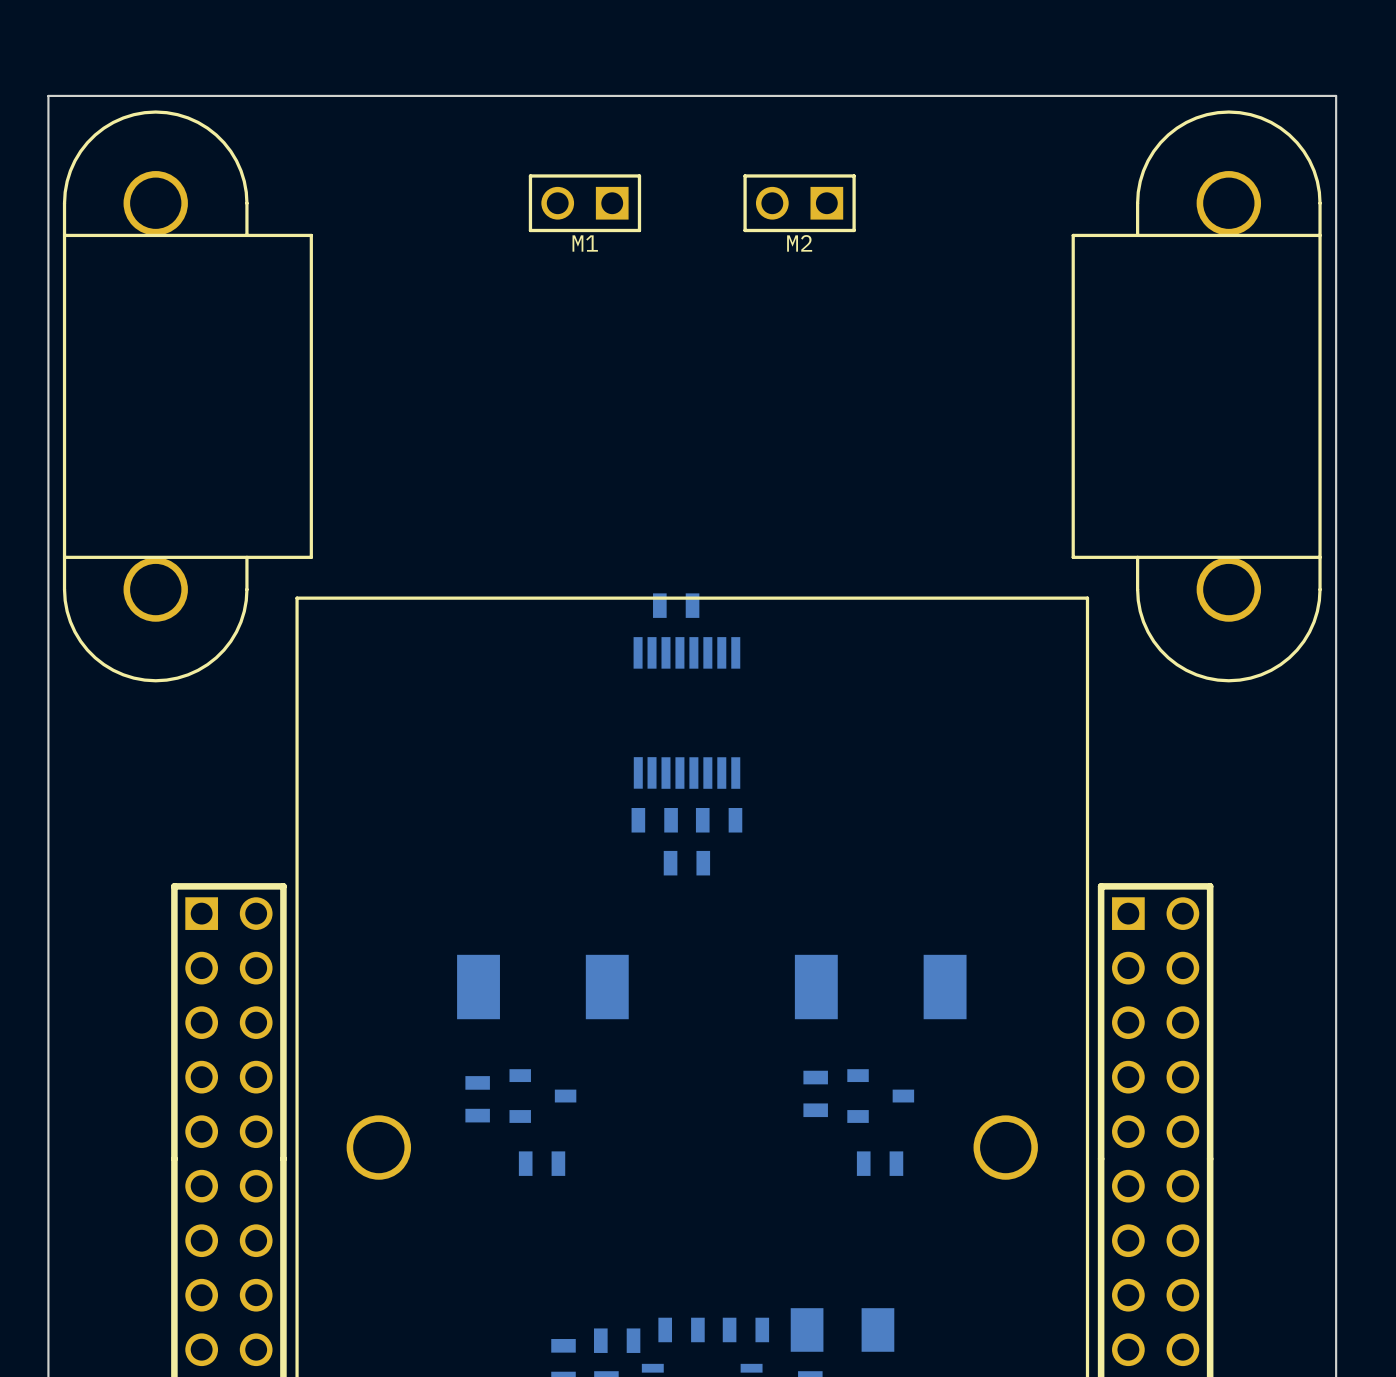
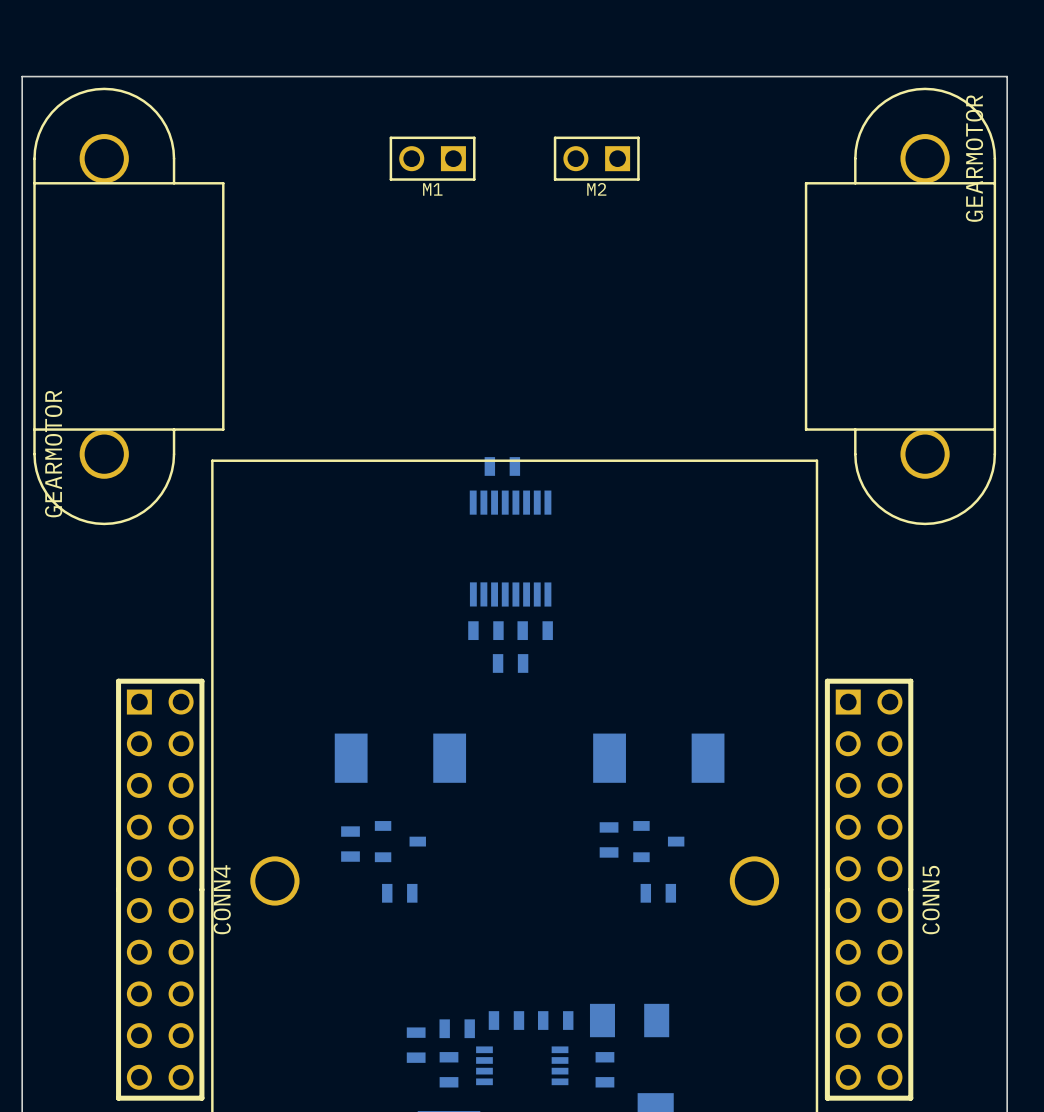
GEARMOTOR name: none -> GEARMOTOR (974, 158)
GEARMOTOR name: none -> GEARMOTOR (53, 454)
CONN4 name: none -> CONN4 (222, 899)
CONN5 name: none -> CONN5 (931, 900)

